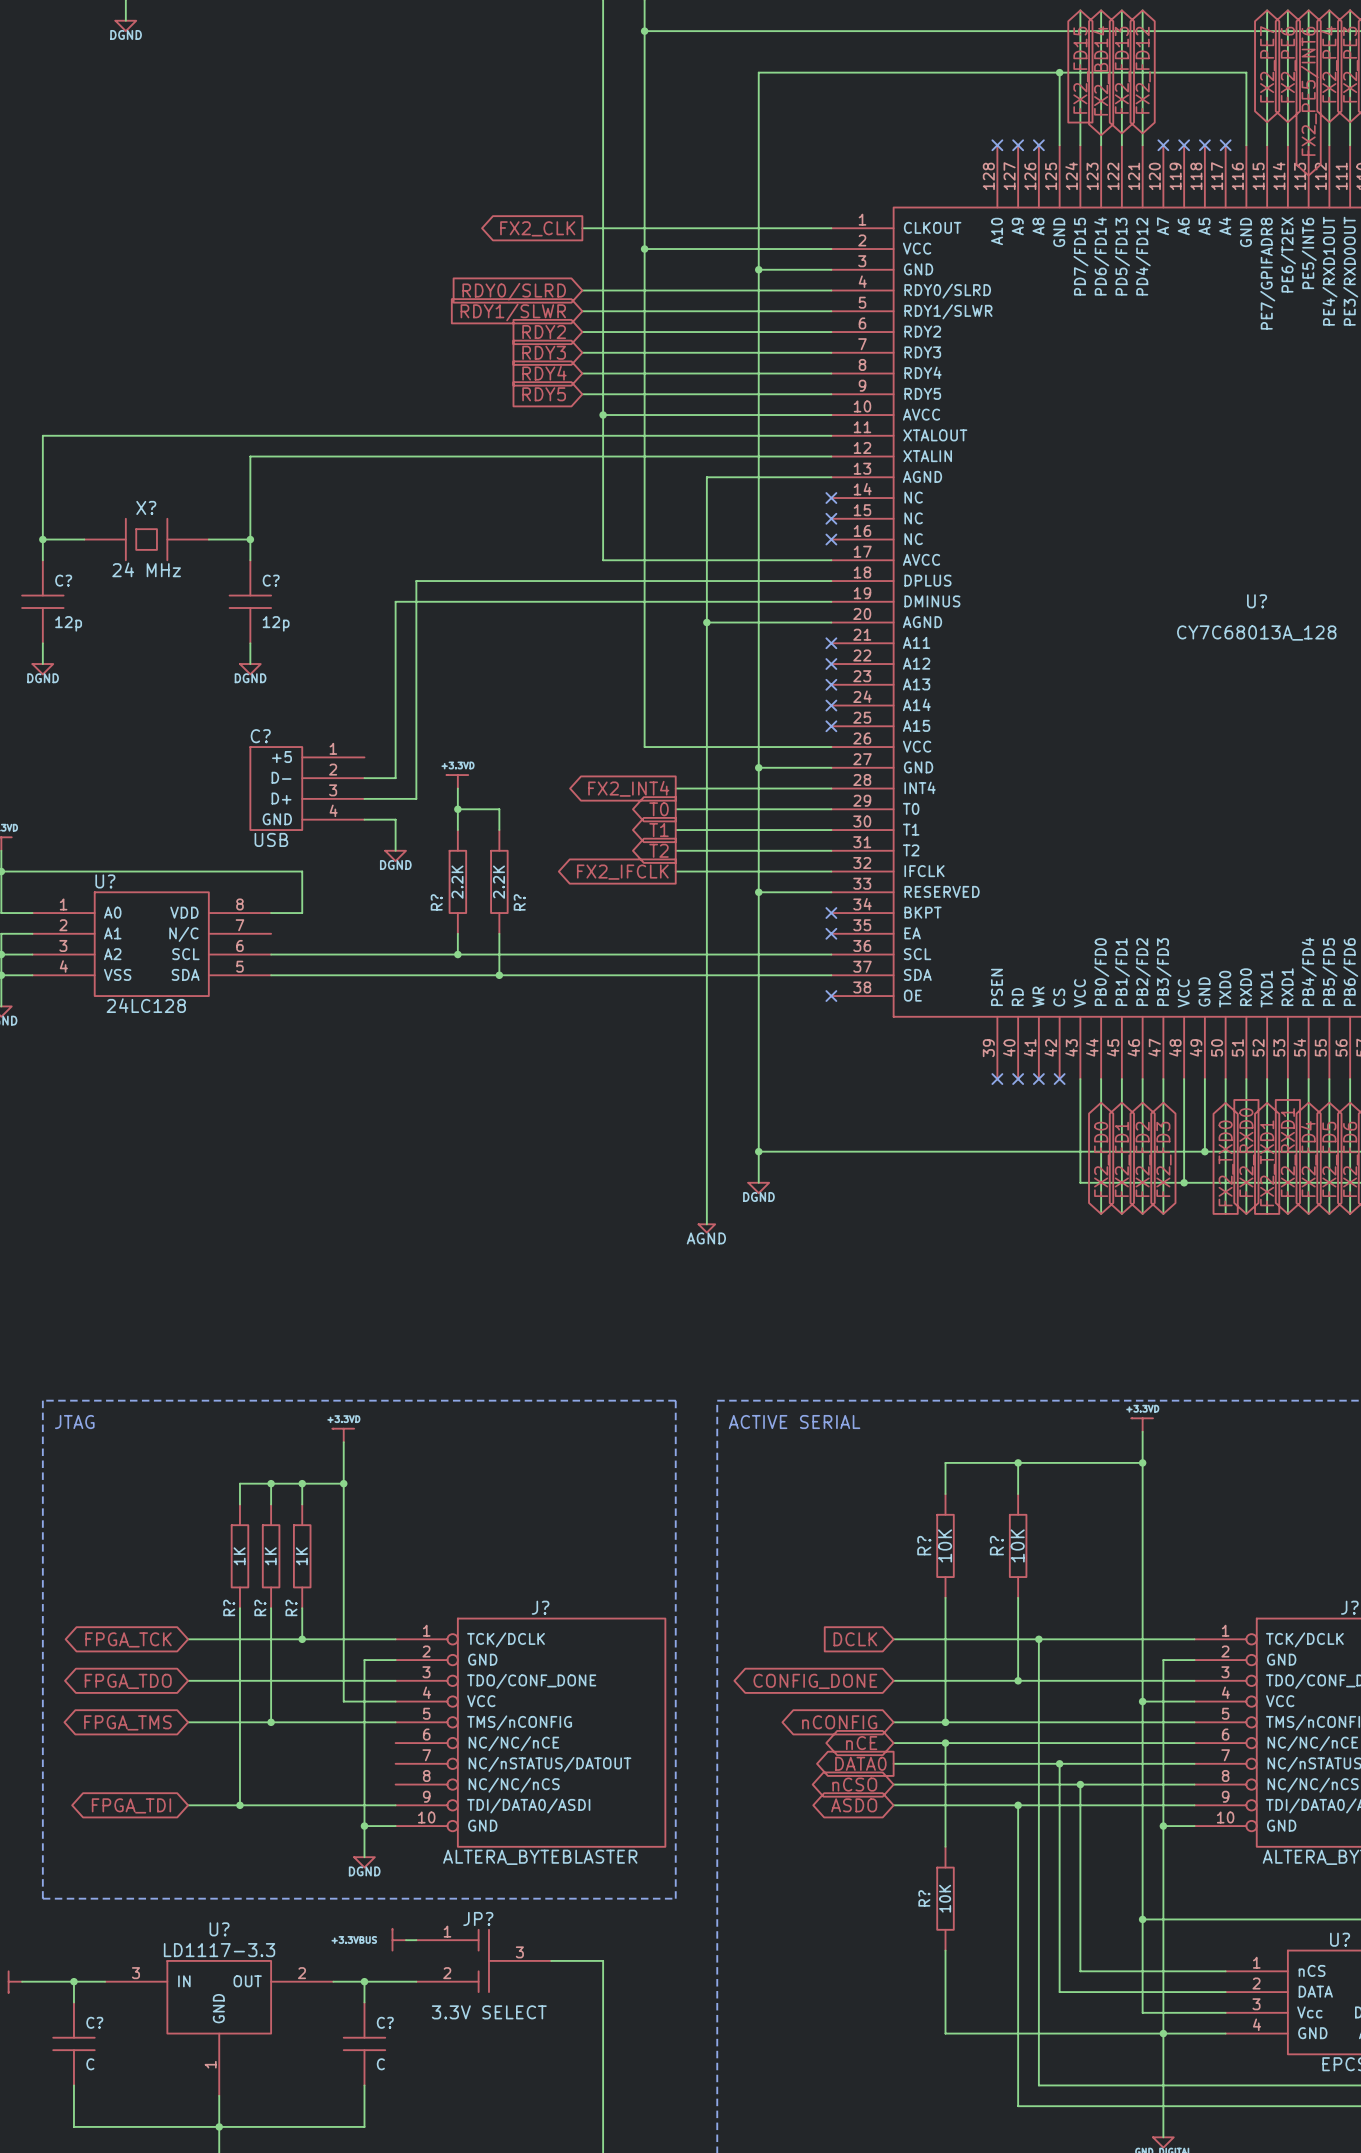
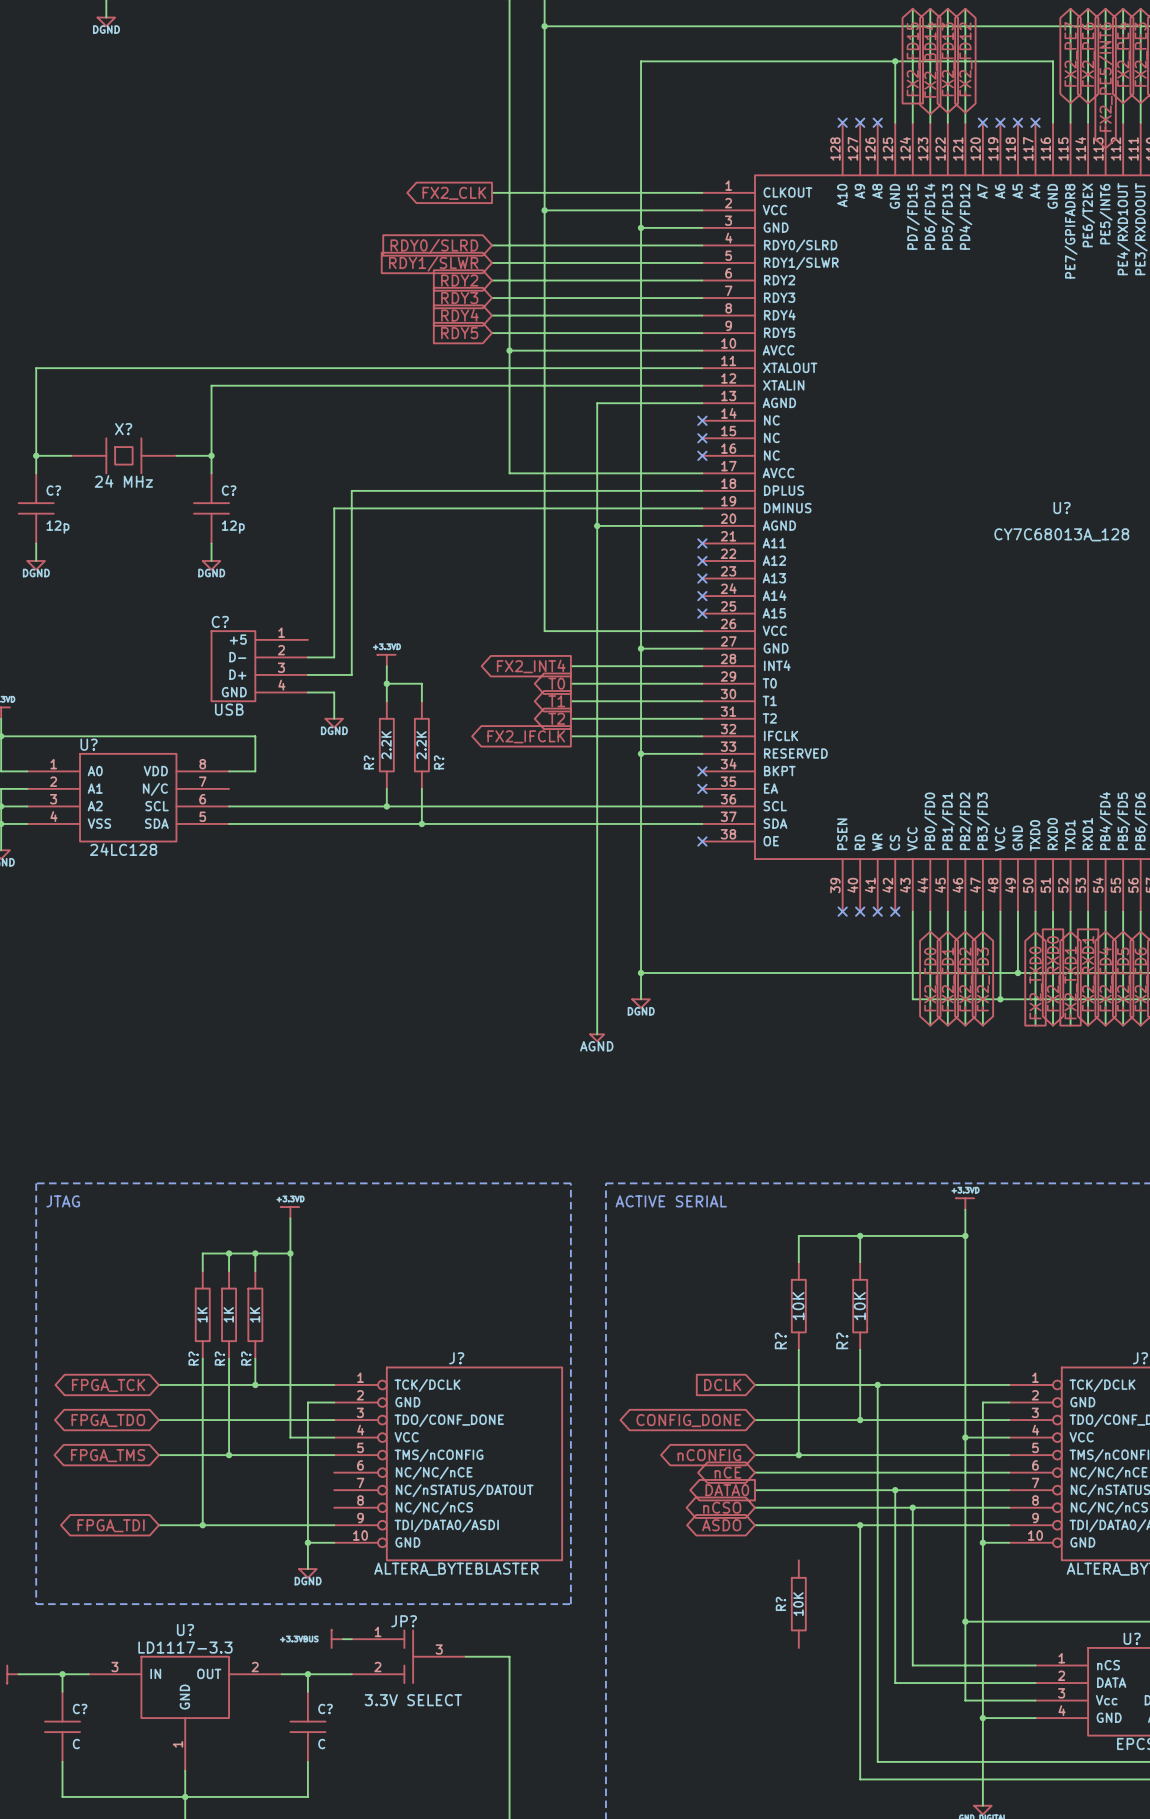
R? name position: R? (924, 1545) -> R? (780, 1340)
R? name position: R? (996, 1545) -> R? (842, 1340)
wire: (945, 1743) (945, 1846) -> none
junction: (945, 1743) -> none
wire: (945, 1950) (945, 2033) (1163, 2033) -> none

